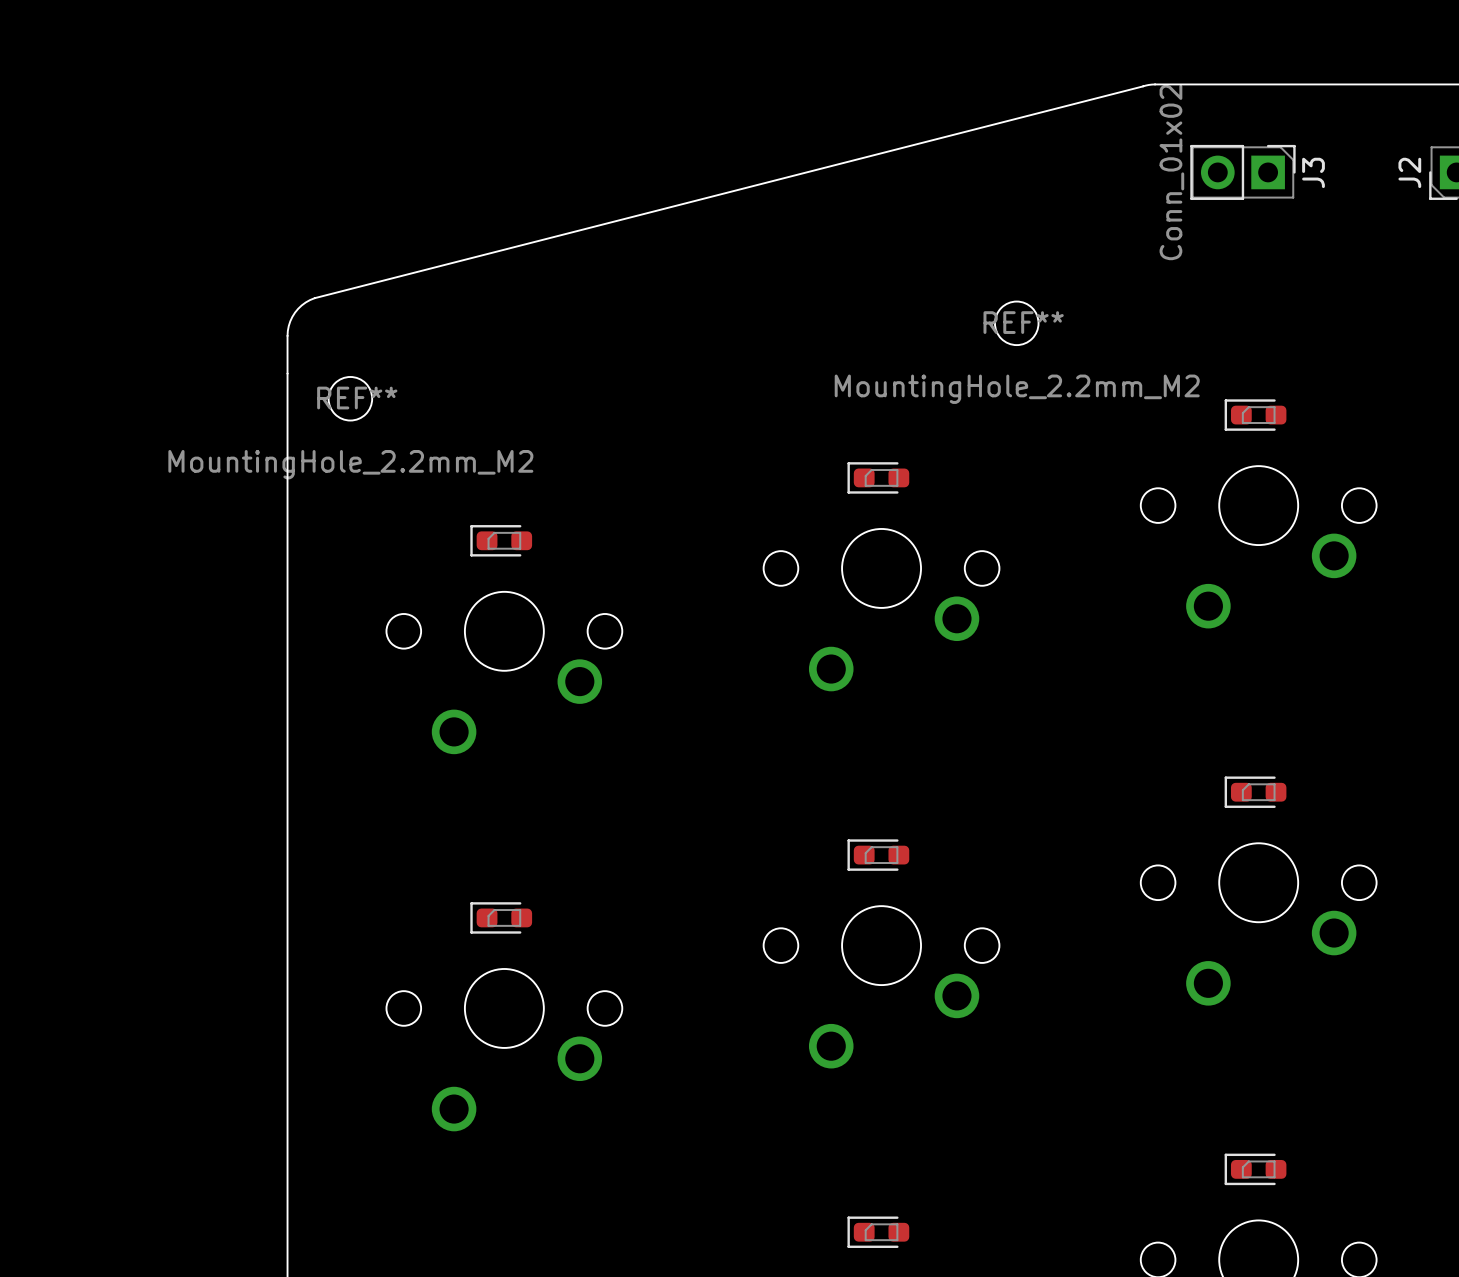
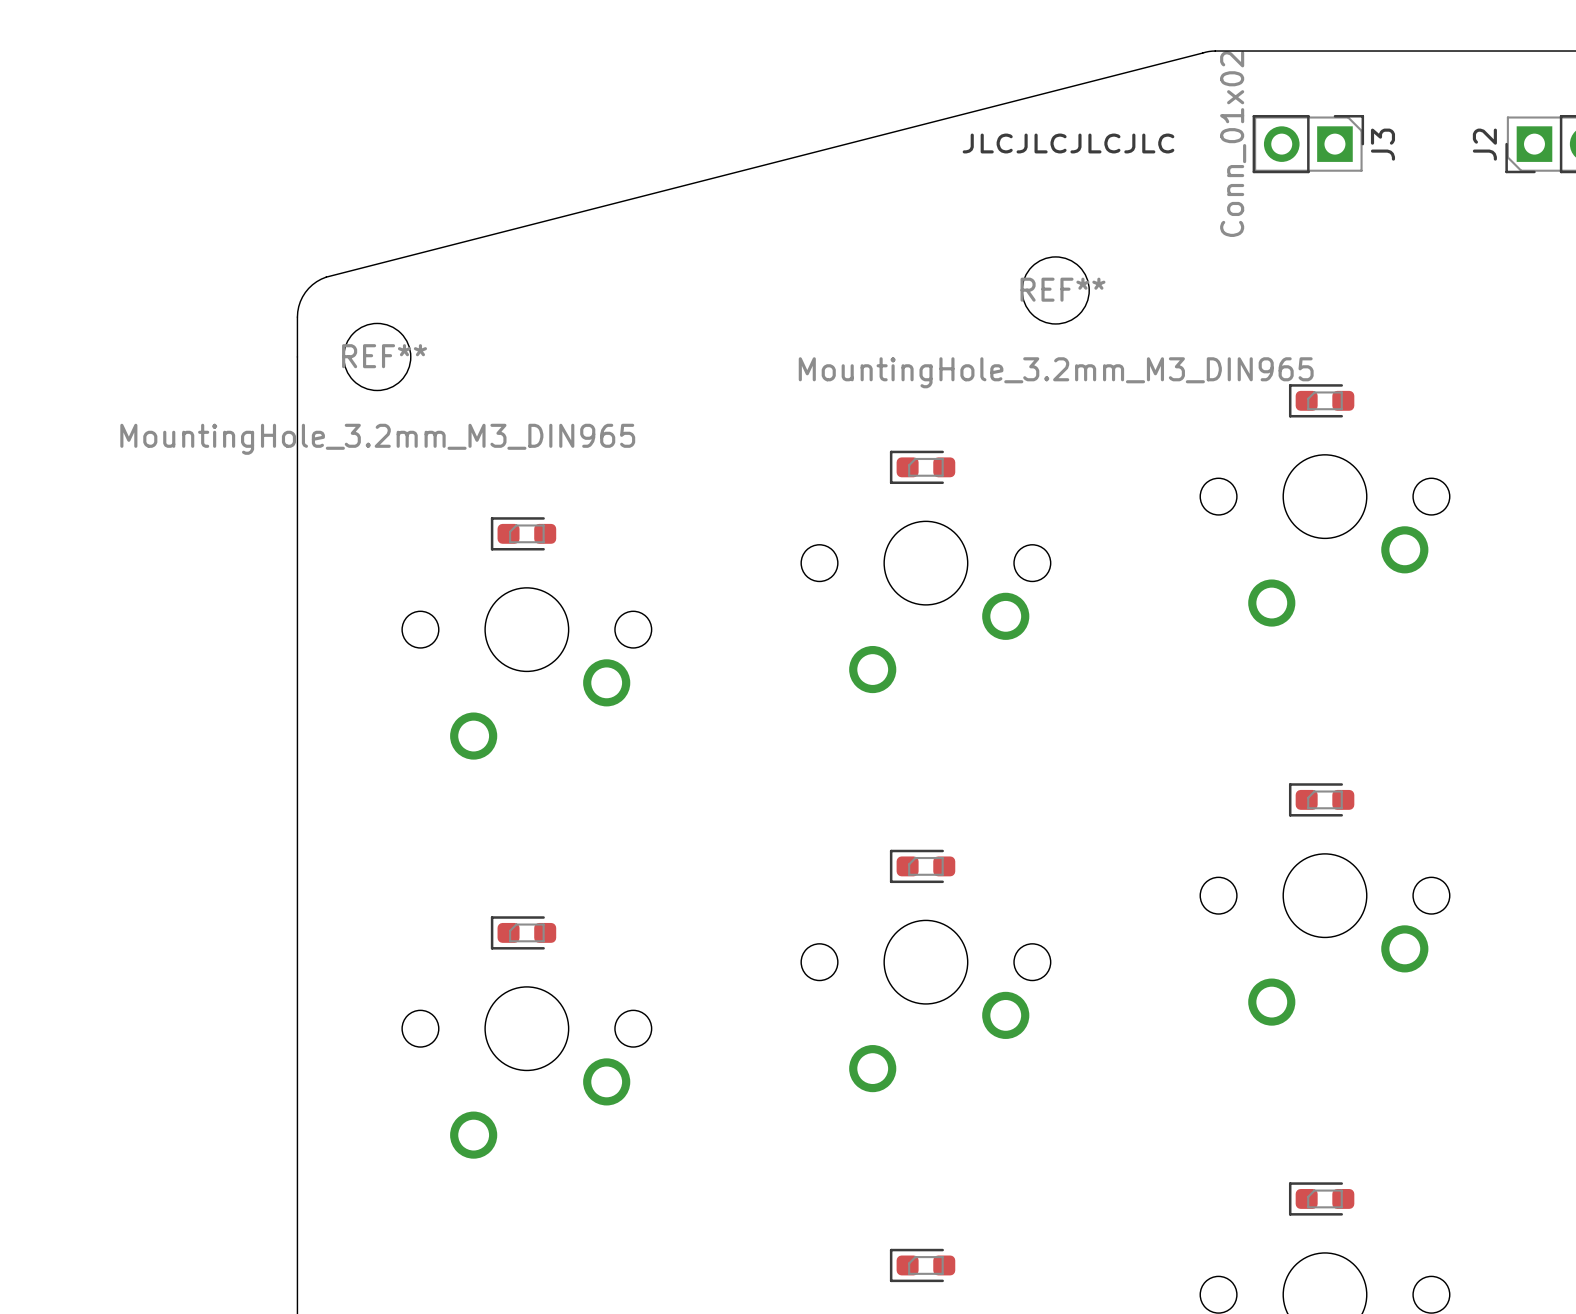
text: none -> JLCJLCJLCJLC (1068, 143)
REF** footprint: [994, 301, 1039, 346] -> [1022, 256, 1090, 324]
REF**: none -> MountingHole_3.2mm_M3_DIN965 (377, 356)
REF** value: MountingHole_2.2mm_M2 (1017, 389) -> MountingHole_3.2mm_M3_DIN965 (1056, 372)
REF**: MountingHole_2.2mm_M2 (350, 398) -> none

